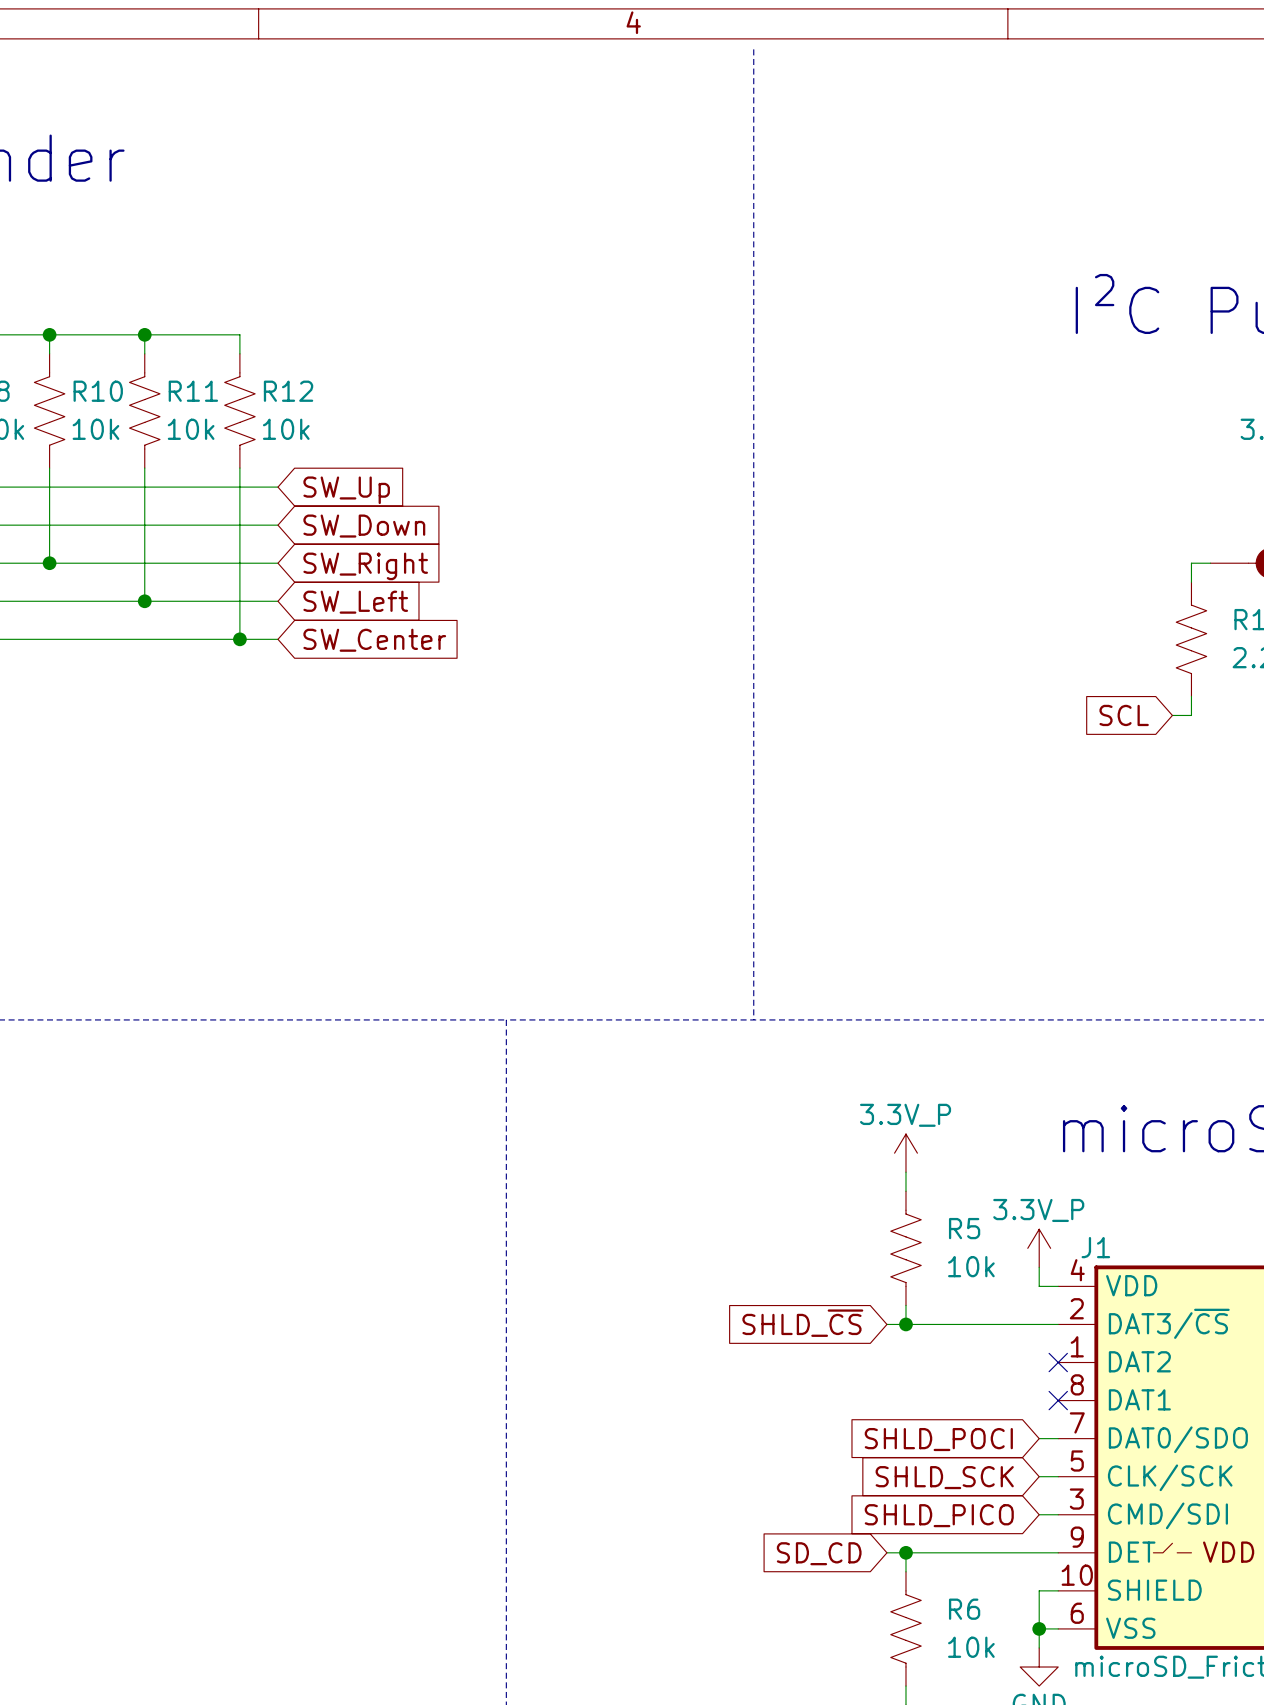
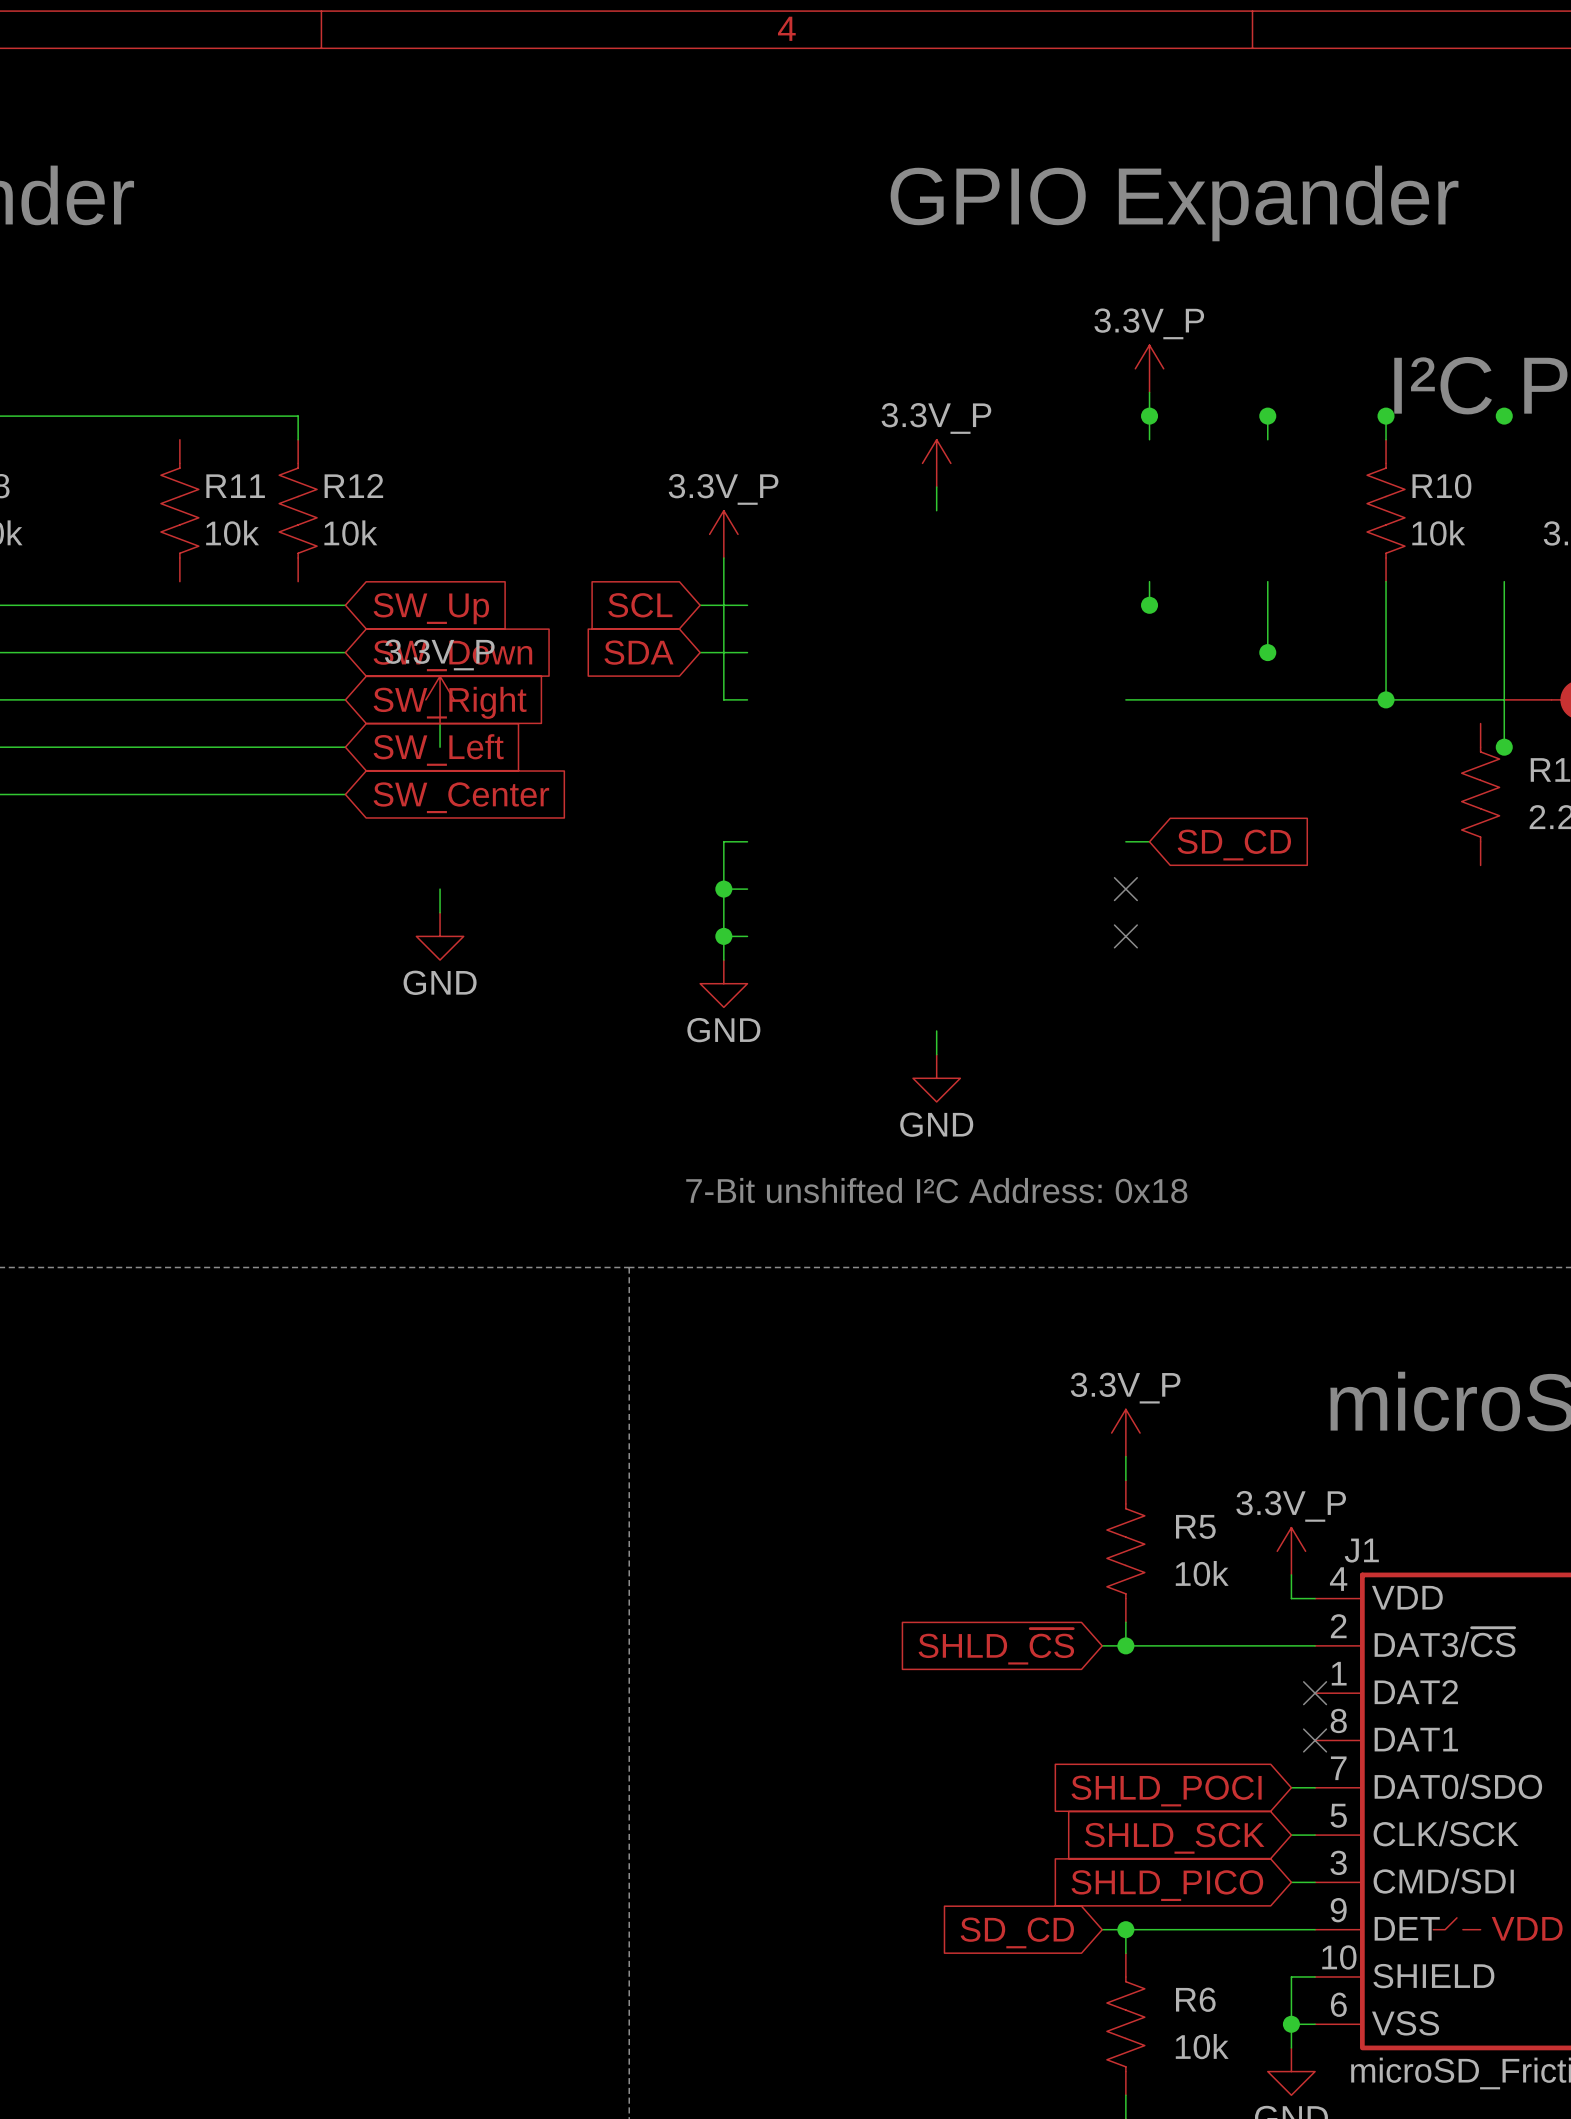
line: (753, 49) (753, 1019) -> none
text: none -> GPIO Expander (1174, 203)
power symbol: none -> 3.3V_P (1149, 368)
wire: none -> (1149, 392) (1149, 439)
wire: (49, 334) (49, 353) -> none
junction: (49, 334) -> none
wire: (144, 334) (144, 353) -> (440, 723) (440, 747)
junction: (144, 334) -> none
junction: none -> (1149, 416)
wire: none -> (1267, 416) (1267, 439)
junction: none -> (1267, 416)
wire: none -> (1386, 416) (1386, 439)
junction: none -> (1386, 416)
junction: none -> (1504, 416)
power symbol: none -> 3.3V_P (936, 463)
R10 position: (49, 410) -> (1386, 510)
power symbol: none -> 3.3V_P (723, 534)
wire: none -> (723, 558) (723, 699) (747, 699)
wire: (49, 468) (49, 563) -> none
wire: (144, 468) (144, 601) -> none
wire: (239, 468) (239, 639) -> none
wire: none -> (1149, 581) (1149, 605)
wire: none -> (1267, 581) (1267, 652)
wire: none -> (1386, 581) (1386, 699)
wire: none -> (1504, 581) (1504, 747)
global label: none -> SCL (640, 605)
wire: none -> (700, 605) (747, 605)
junction: none -> (1149, 605)
global label: none -> SDA (638, 652)
wire: none -> (700, 652) (747, 652)
junction: none -> (1267, 652)
junction: (49, 563) -> none
power symbol: none -> 3.3V_P (440, 699)
junction: none -> (1386, 699)
wire: (1191, 563) (1191, 582) -> (1480, 699) (1125, 699)
junction: (144, 601) -> none
junction: none -> (1504, 747)
junction: (239, 639) -> none
wire: none -> (747, 841) (723, 841) (723, 960)
wire: none -> (1125, 841) (1149, 841)
global label: none -> SD_CD (1234, 845)
wire: (1191, 696) (1191, 715) (1172, 715) -> none
wire: none -> (440, 889) (440, 912)
wire: none -> (723, 889) (747, 889)
junction: none -> (723, 889)
no-connect mark: none -> (1125, 889)
global label: SCL (1124, 715) -> none
power symbol: none -> GND (440, 936)
wire: none -> (723, 936) (747, 936)
junction: none -> (723, 936)
no-connect mark: none -> (1125, 936)
power symbol: none -> GND (723, 983)
power symbol: none -> GND (936, 1078)
text: none -> 7-Bit unshifted I²C Address: 0x18 (936, 1190)

